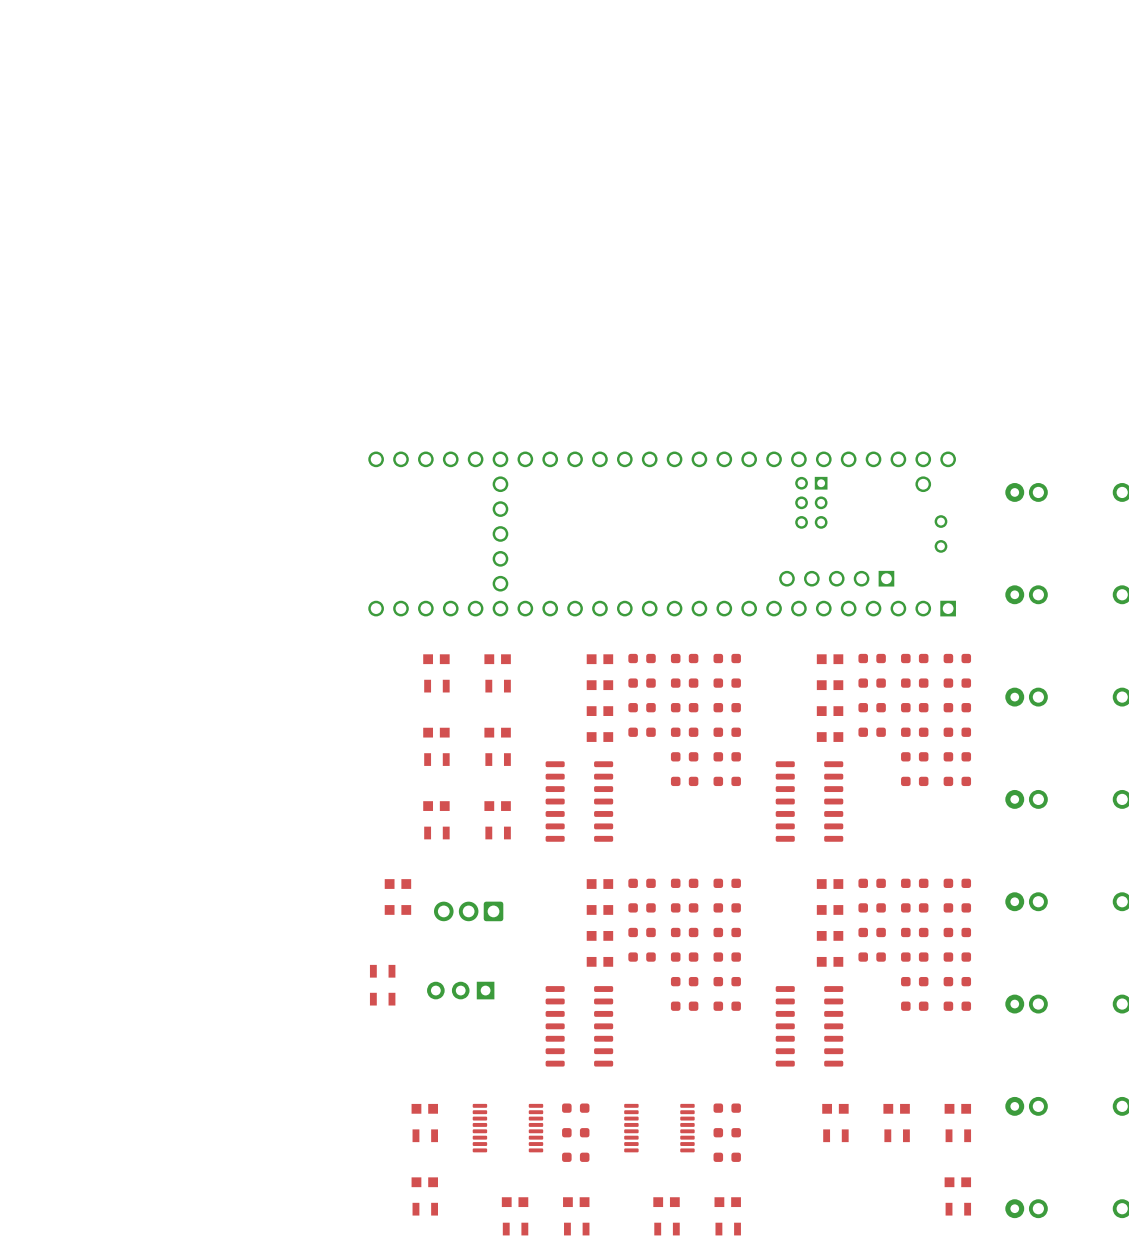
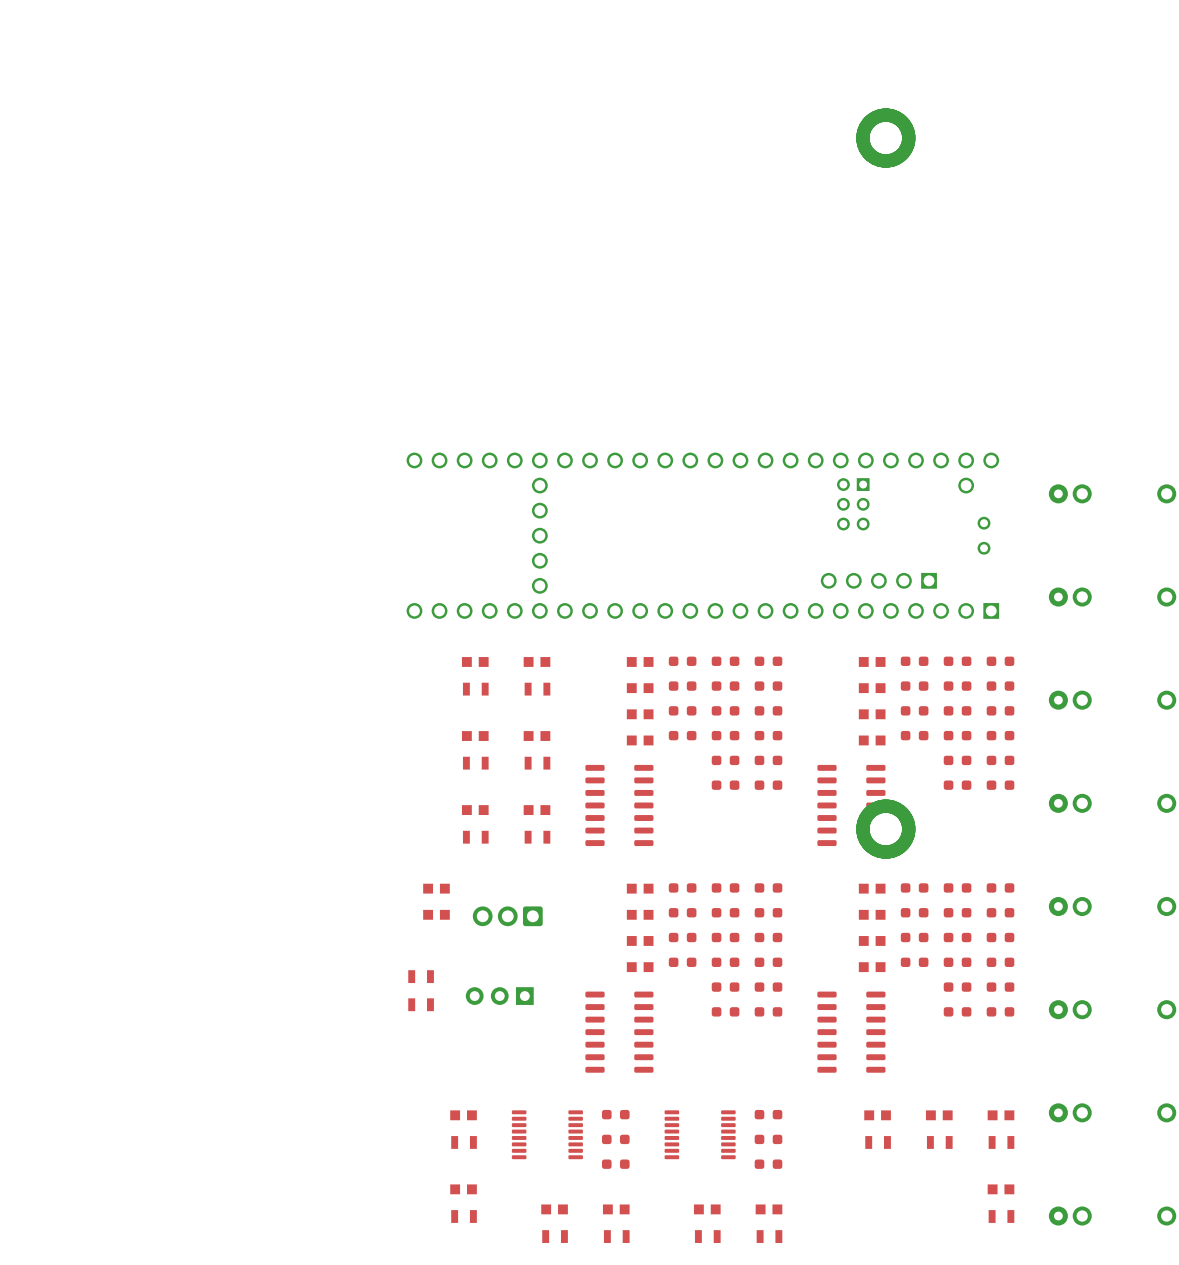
via: none -> (885, 138)
via: none -> (885, 829)

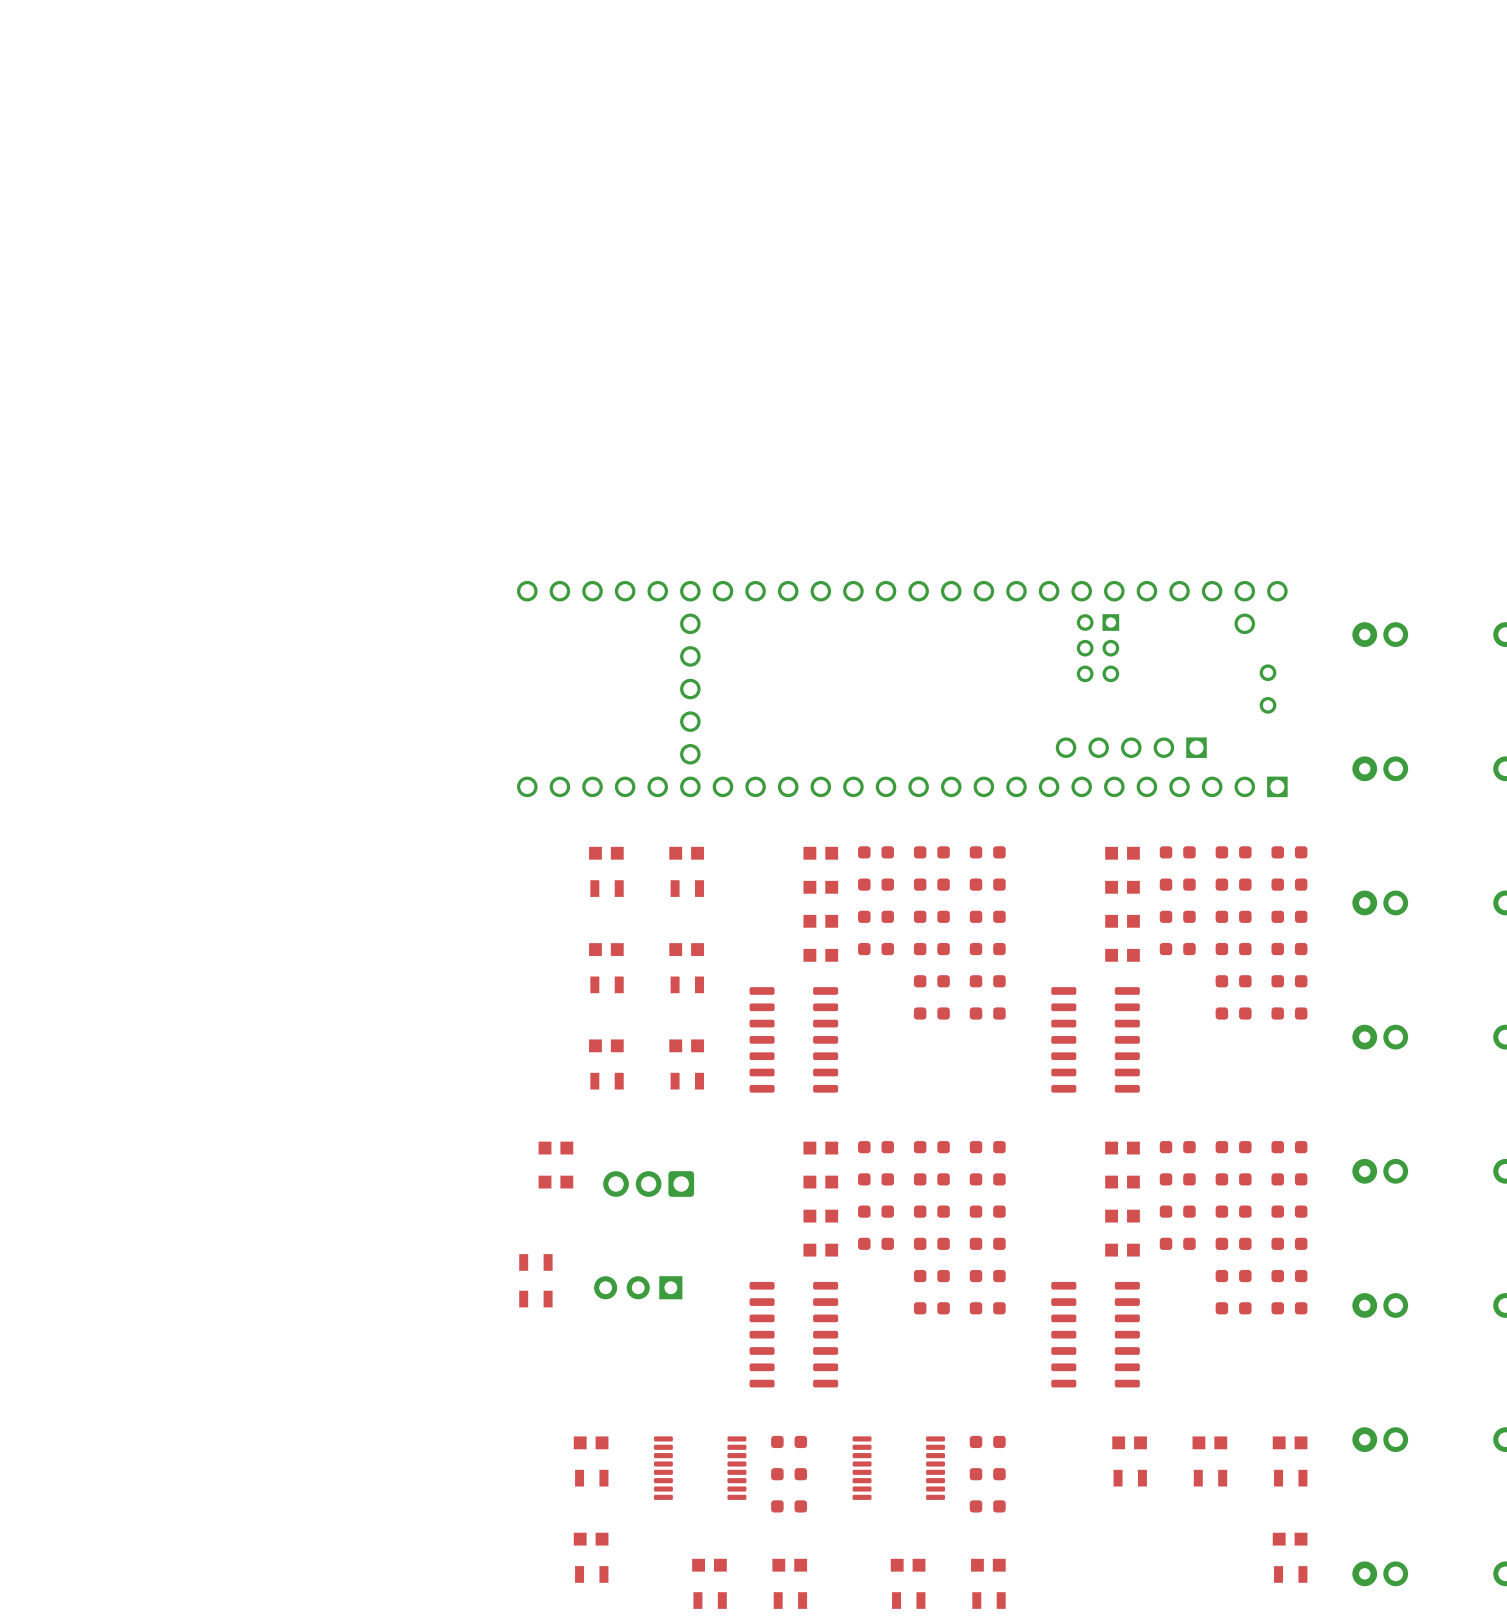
via: (885, 138) -> none
via: (885, 829) -> none

